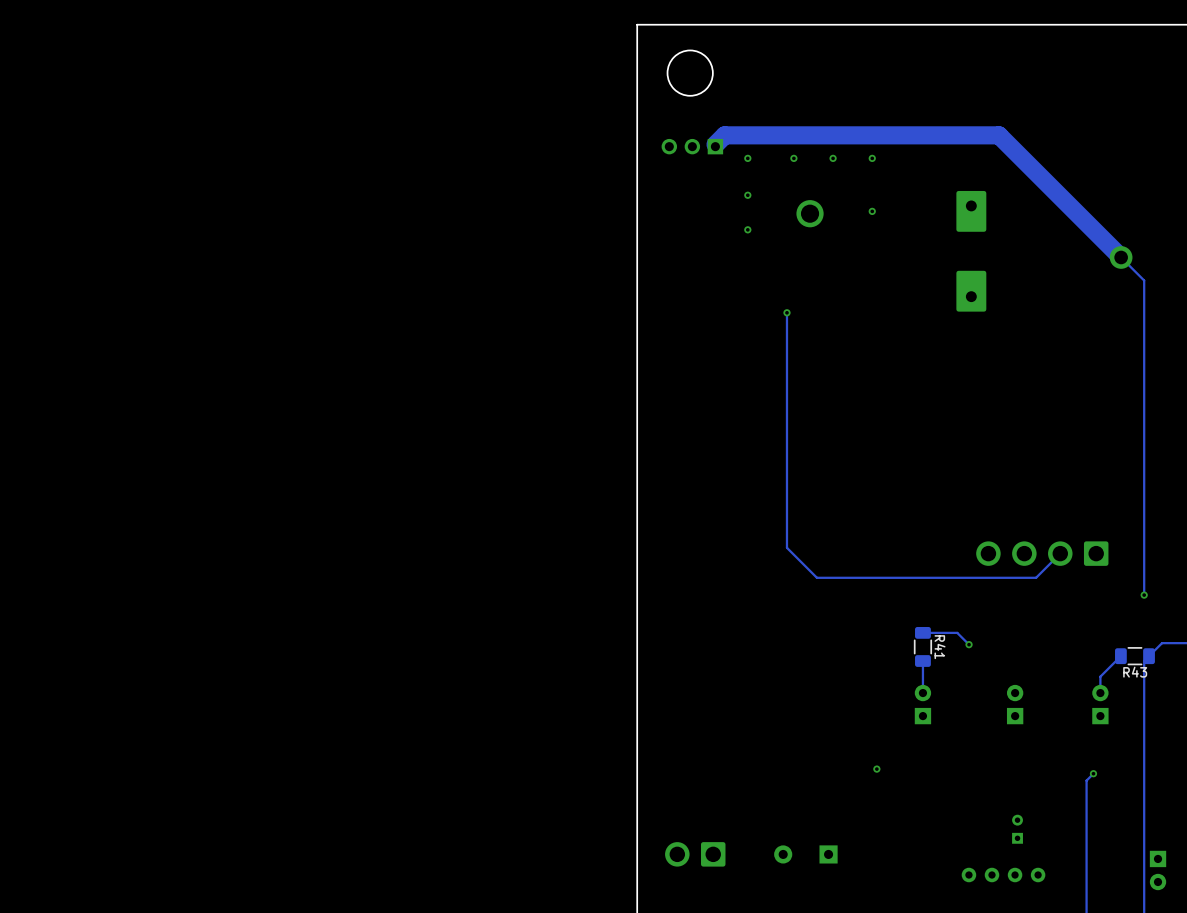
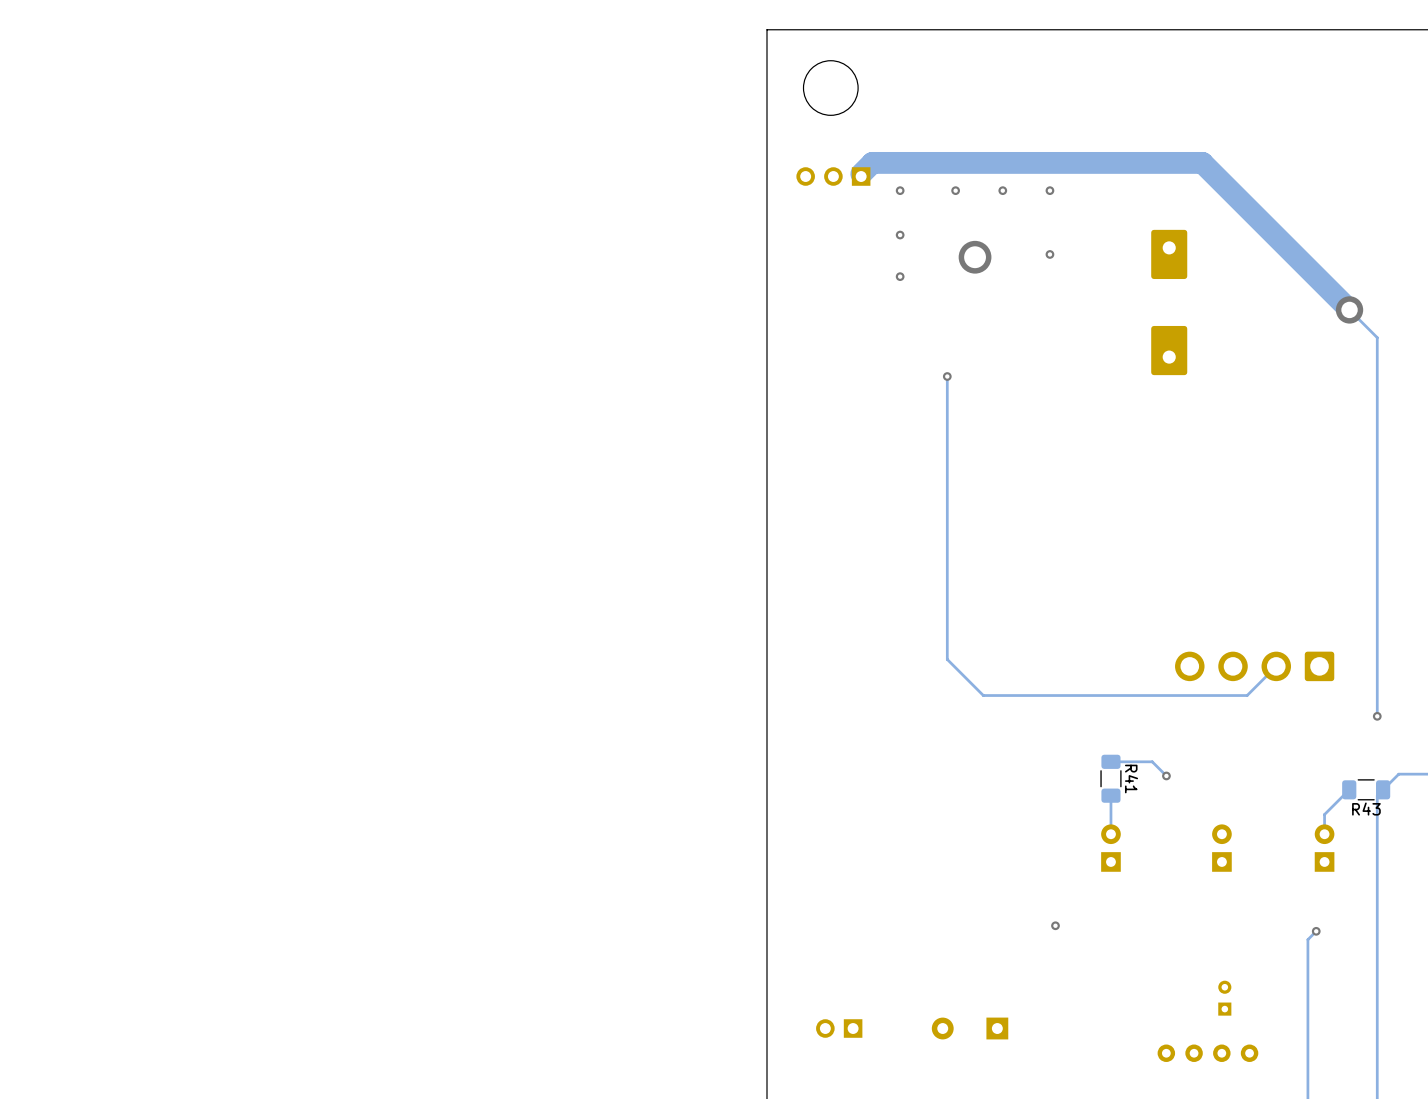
part footprint: [665, 842, 726, 867] -> [816, 1019, 863, 1038]
part: (1158, 870) -> none

